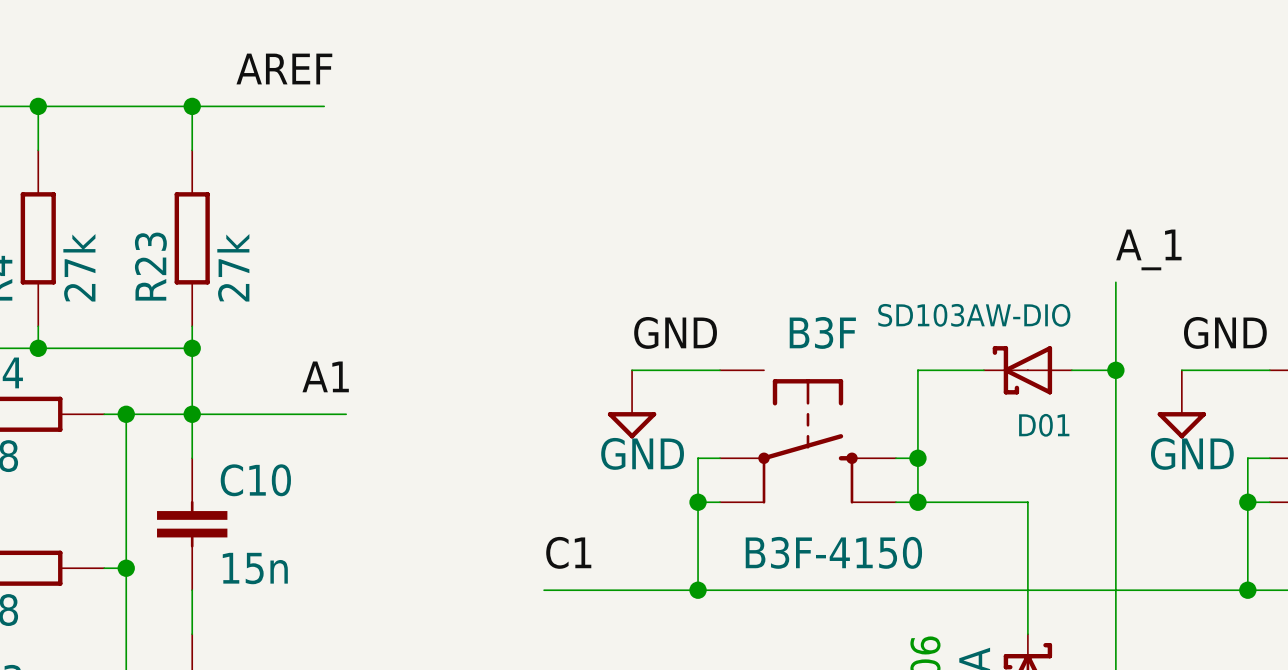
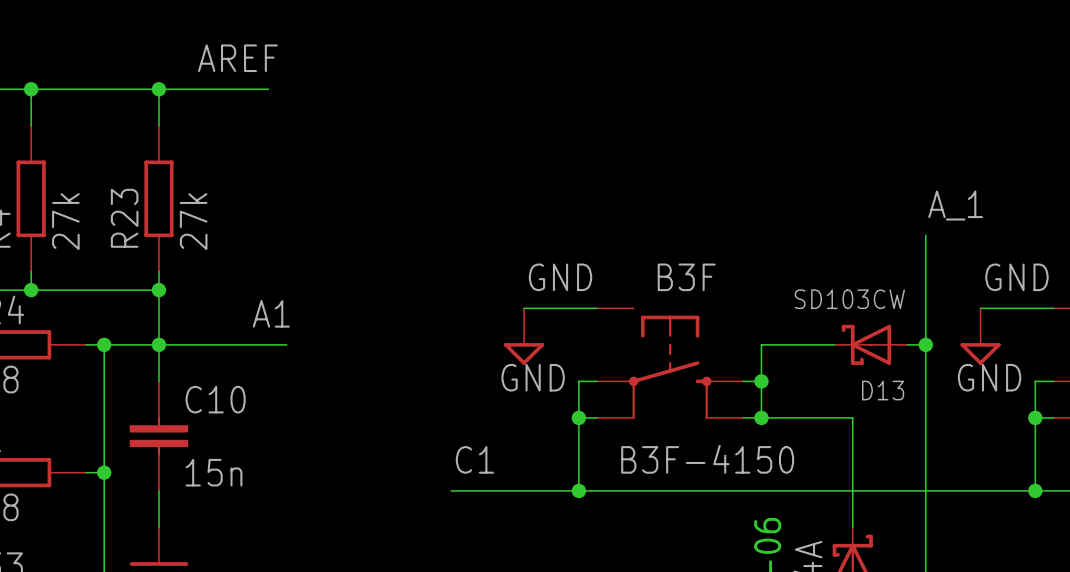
wire: (983, 370) (917, 370) (917, 414) -> (834, 344) (761, 344)
D01: SD103AW-DIO (1027, 370) -> none
wire: (1071, 370) (1115, 370) -> none
junction position: (1115, 370) -> (925, 344)
D13: none -> SD103CW (871, 344)
wire: none -> (907, 344) (925, 344)

